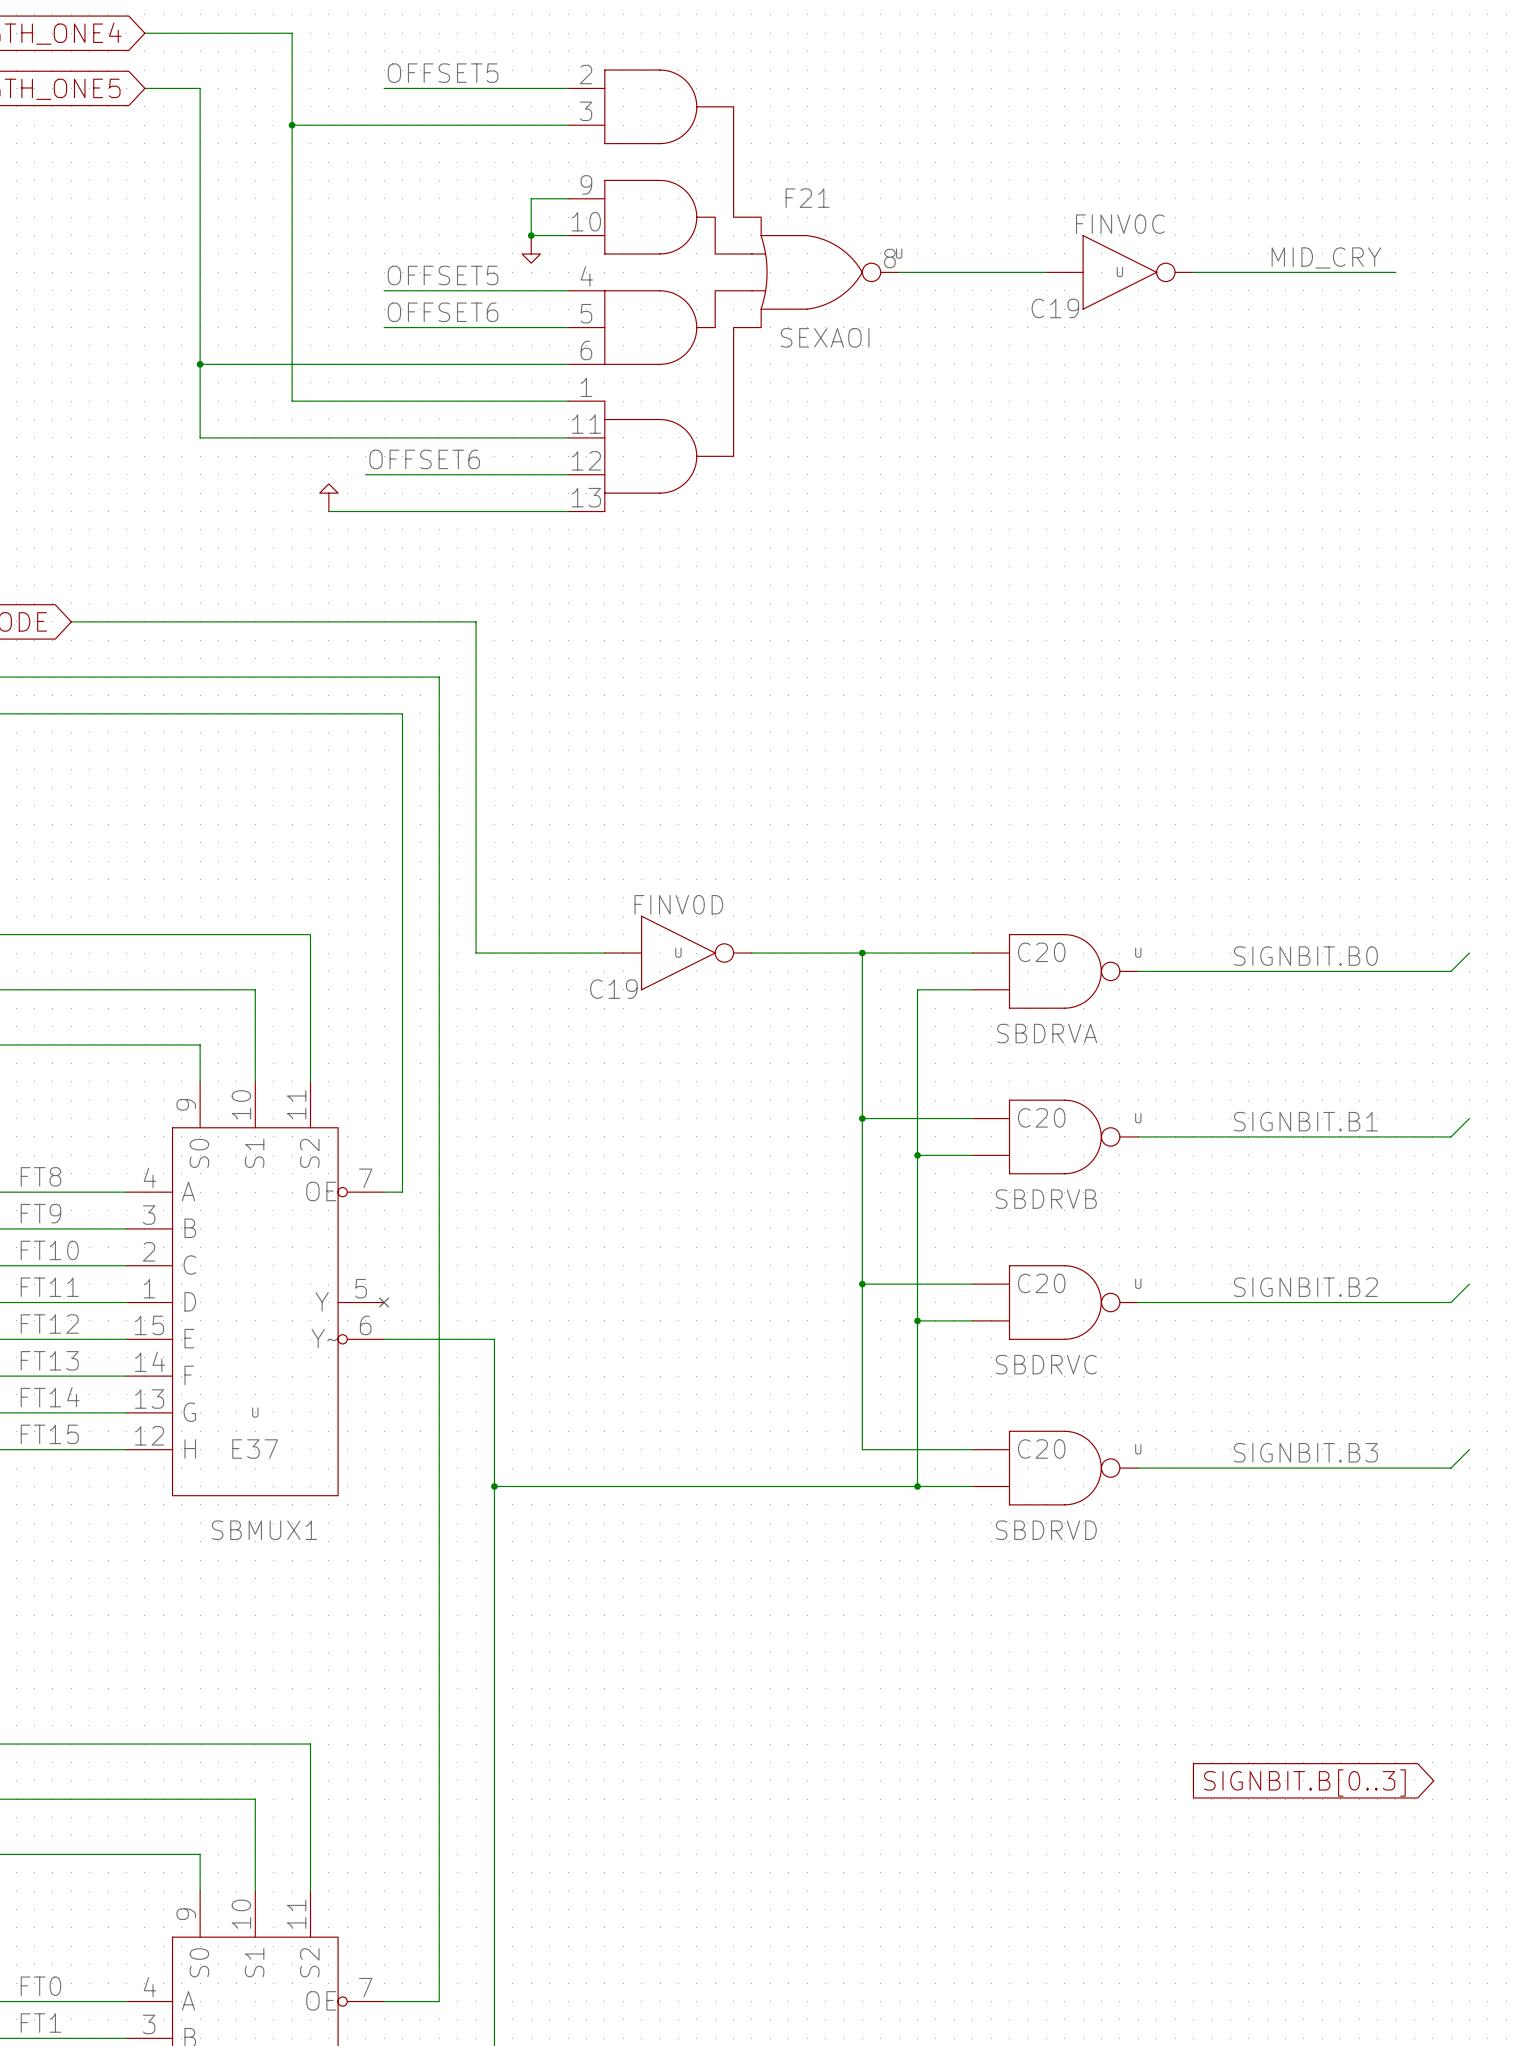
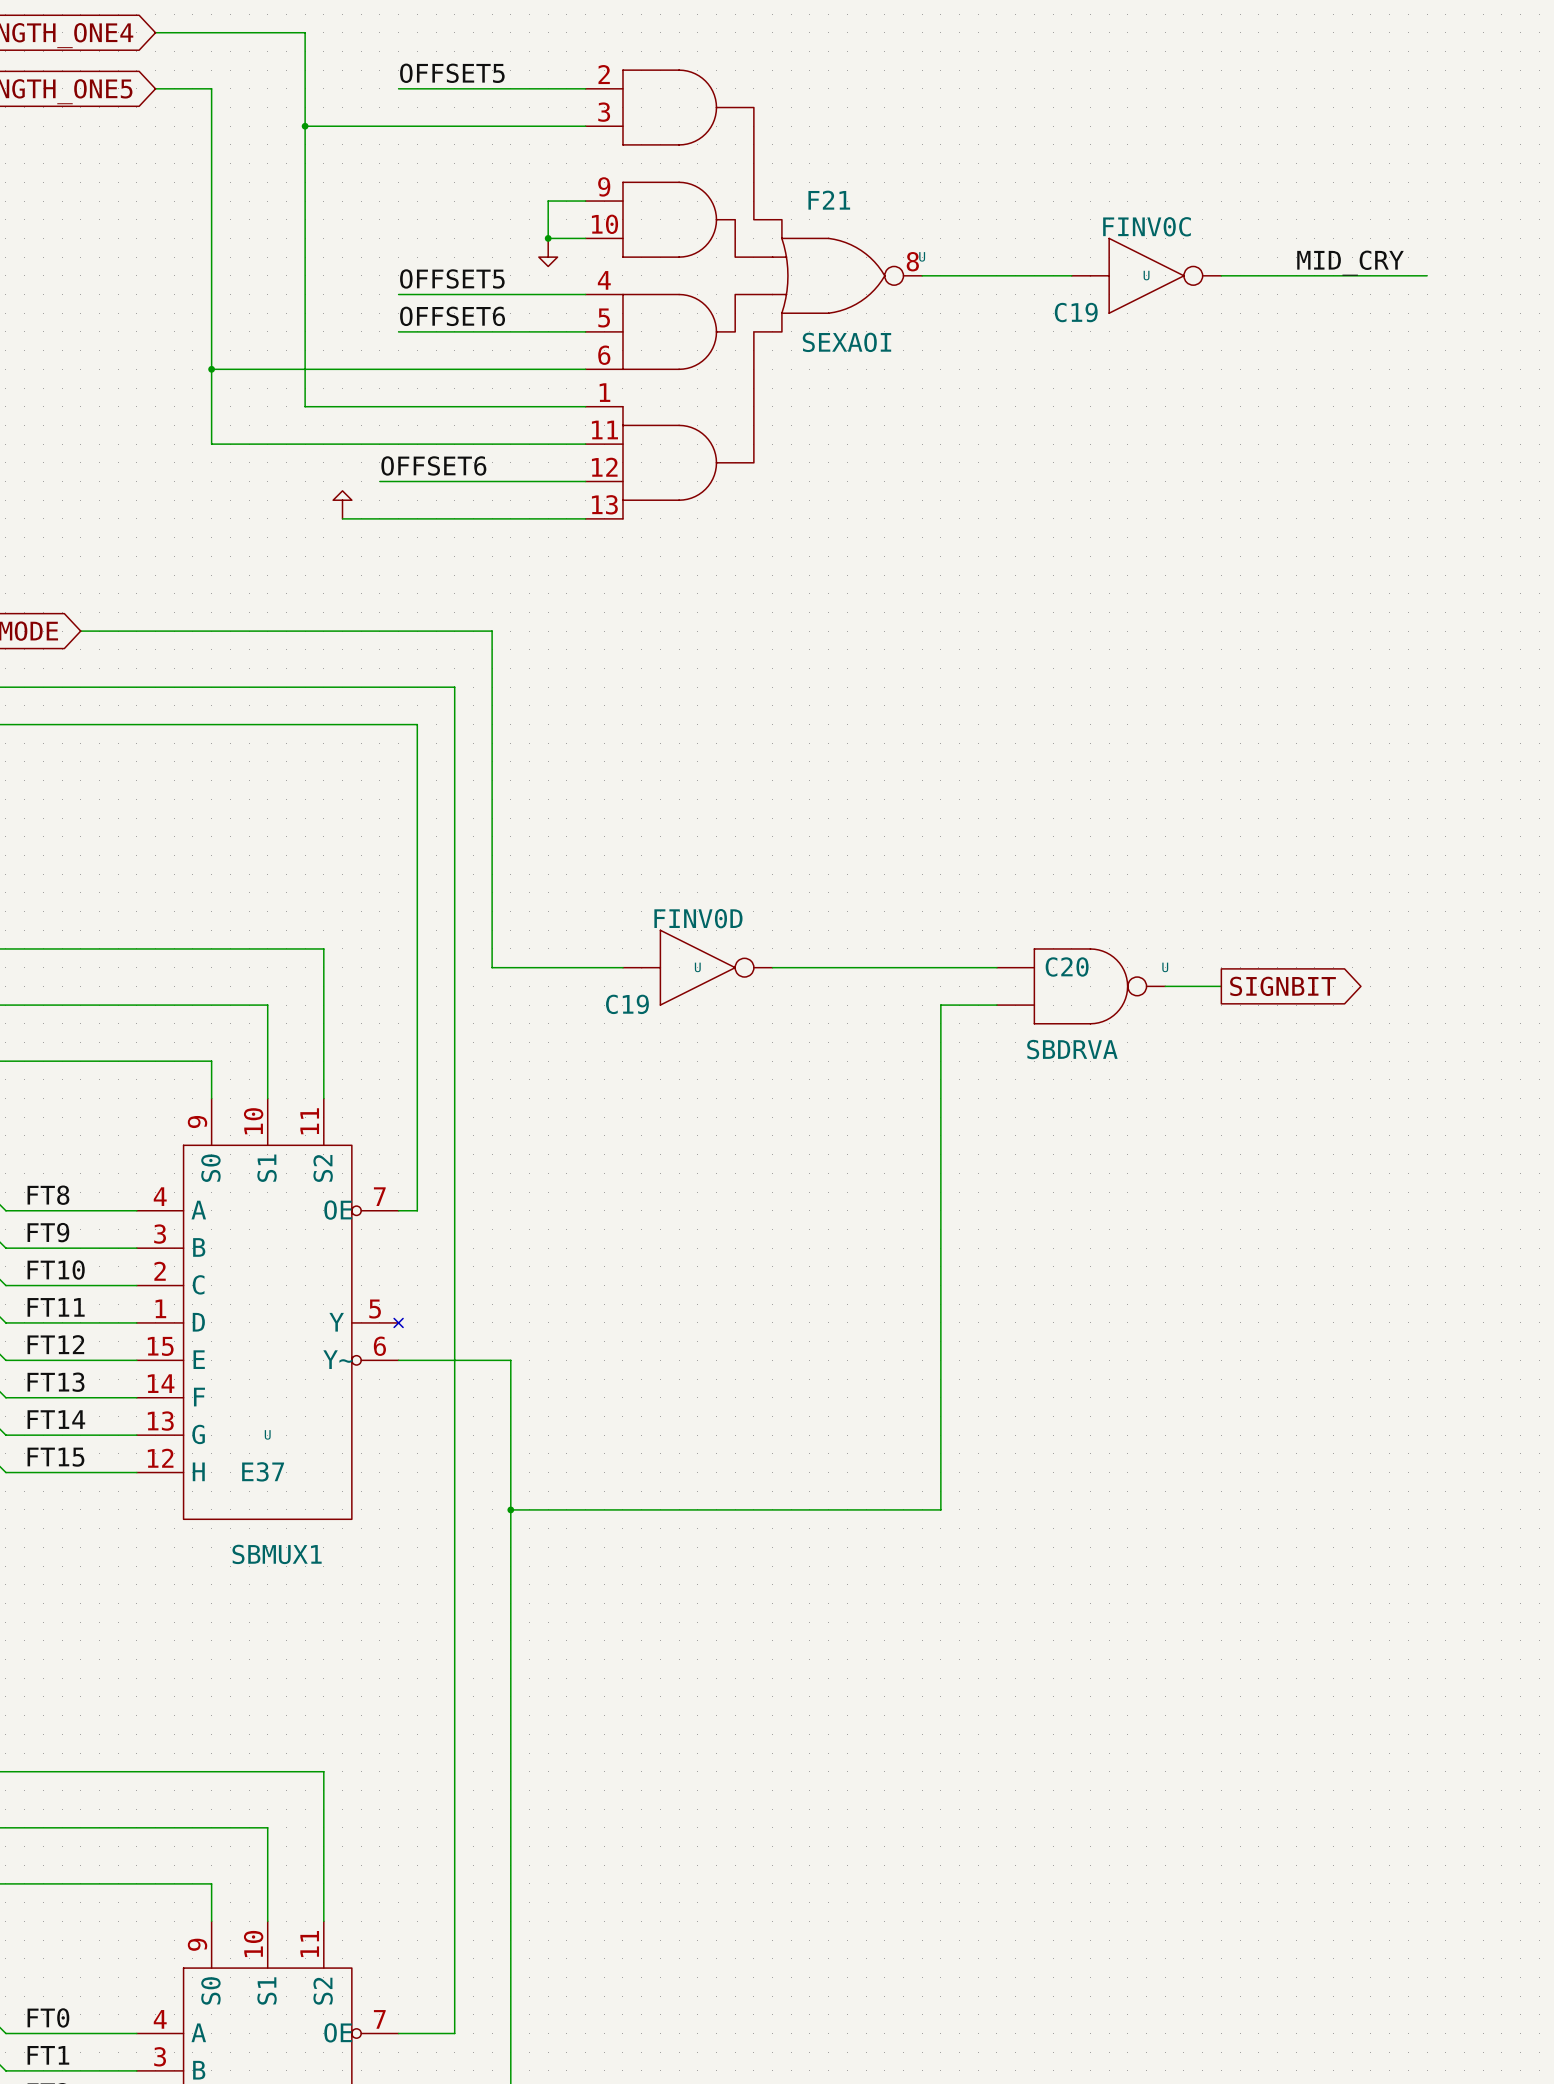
wire: (862, 953) (862, 1449) (972, 1449) -> none
junction: (862, 953) -> none
wire: (1469, 953) (1451, 971) (1193, 971) -> none
label: SIGNBIT.B0 (1305, 956) -> none
global label: none -> SIGNBIT (1282, 986)
wire: (862, 1118) (972, 1118) -> none
junction: (862, 1118) -> none
wire: (1469, 1118) (1451, 1136) (1138, 1136) -> none
label: SIGNBIT.B1 (1305, 1121) -> none
U: (1055, 1136) -> none
wire: (917, 1155) (972, 1155) -> none
junction: (917, 1155) -> none
wire: (862, 1284) (972, 1284) -> none
junction: (862, 1284) -> none
wire: (1469, 1284) (1451, 1302) (1138, 1302) -> none
label: SIGNBIT.B2 (1305, 1287) -> none
U: (1055, 1302) -> none
wire: (917, 1320) (972, 1320) -> none
junction: (917, 1320) -> none
wire: (1469, 1449) (1451, 1468) (1138, 1468) -> none
label: SIGNBIT.B3 (1305, 1452) -> none
U: (1055, 1468) -> none
wire: (917, 1486) (972, 1486) -> none
junction: (917, 1486) -> none
global label: SIGNBIT.B[0..3] (1304, 1783) -> none

